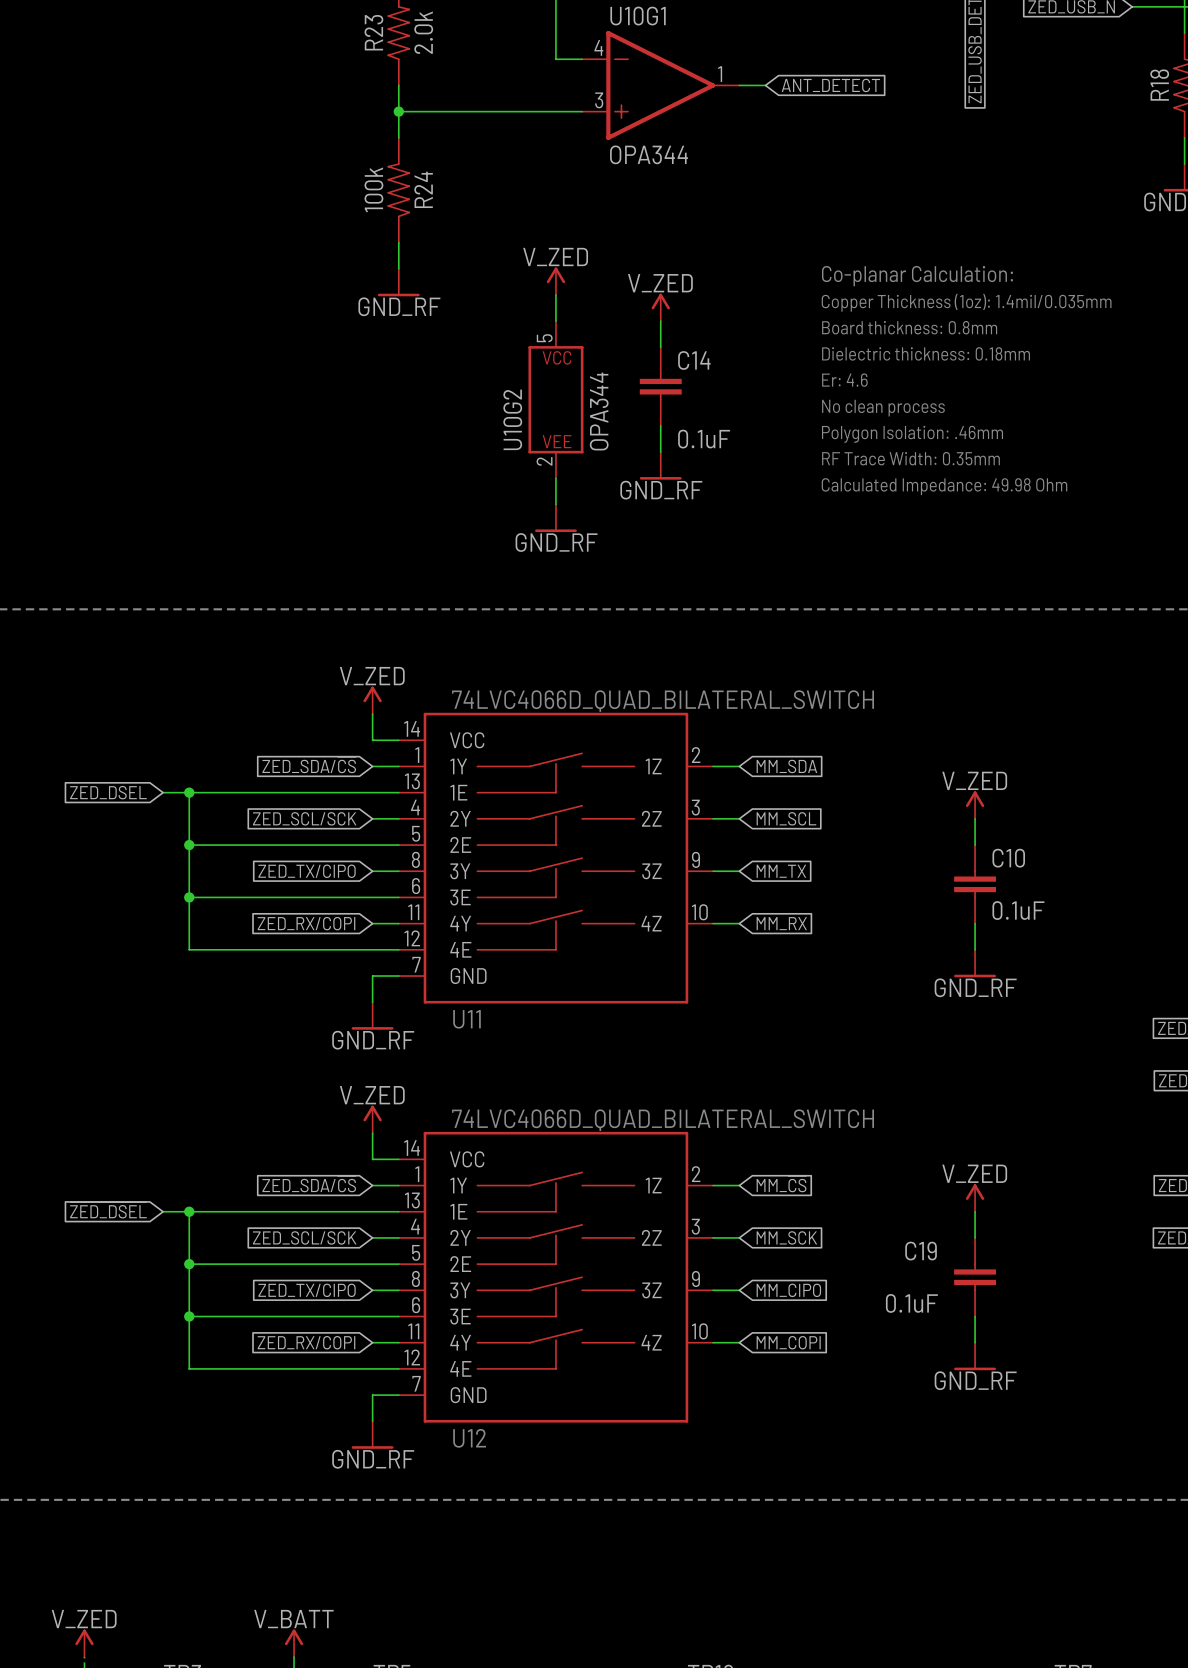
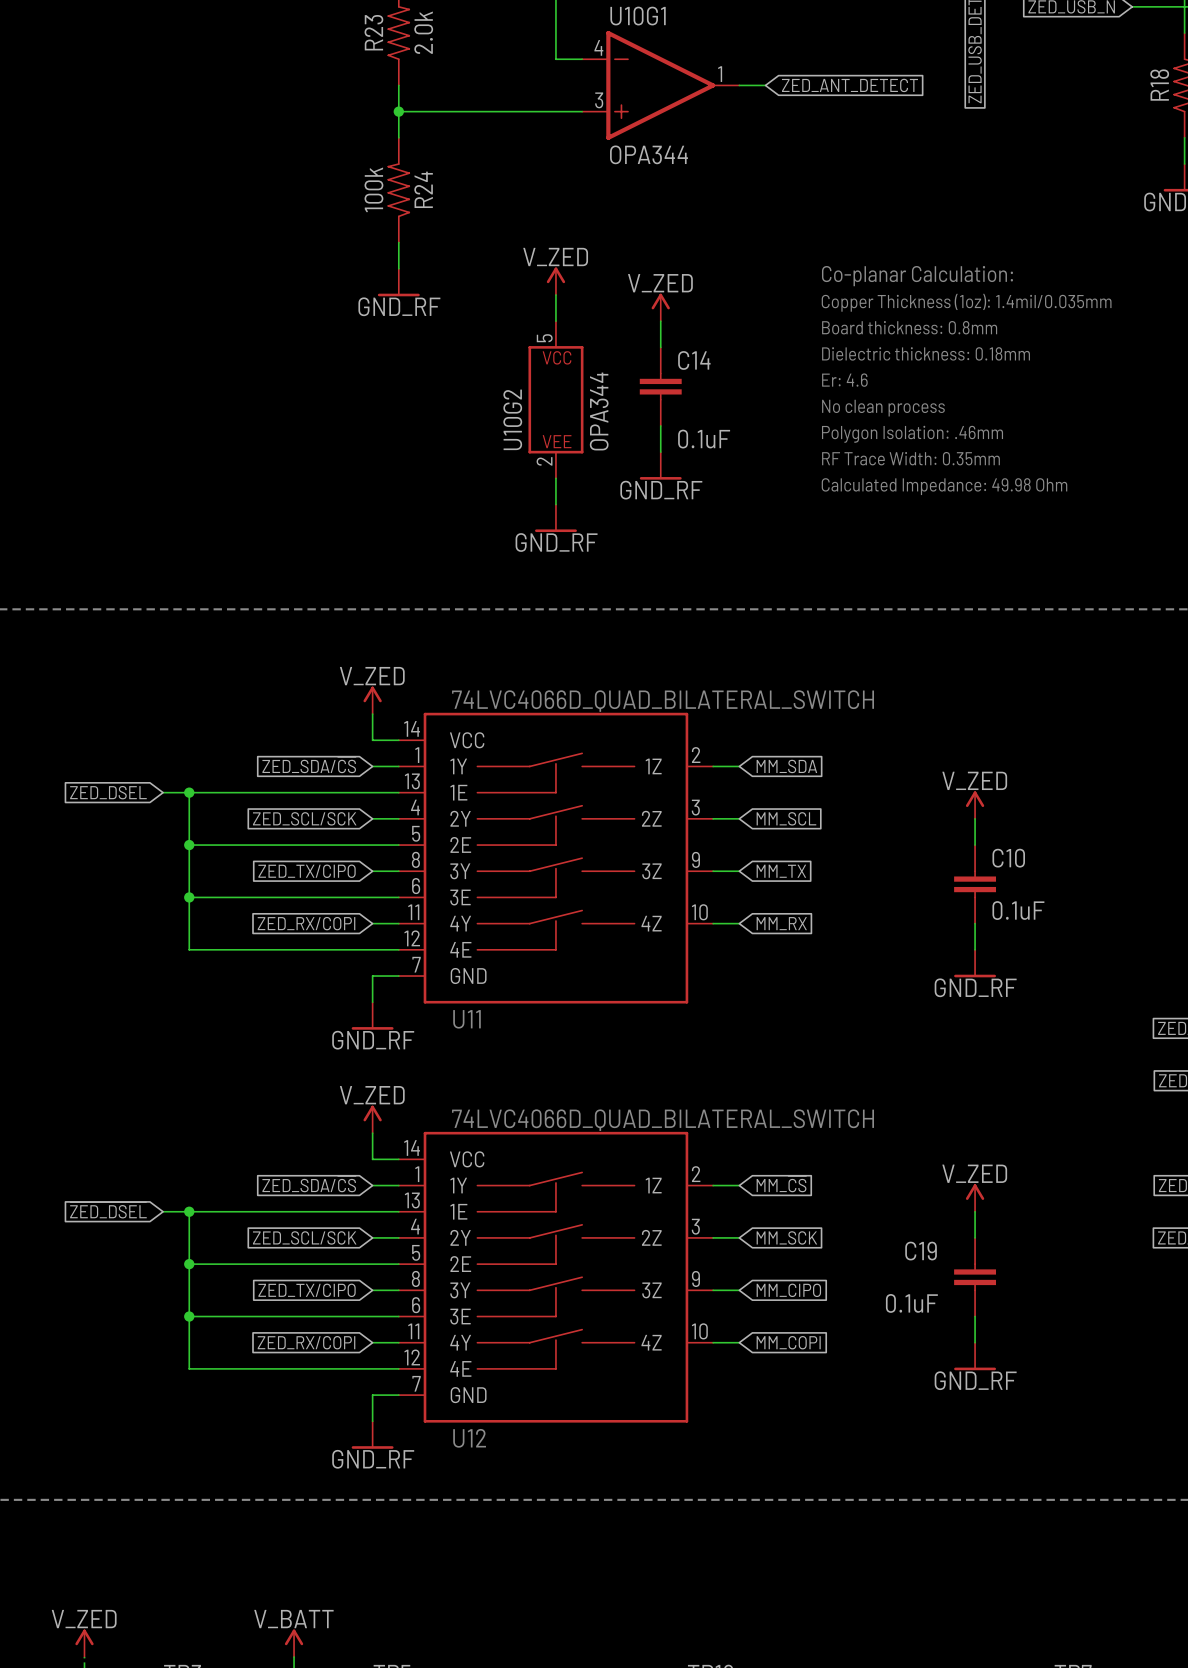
global label: ANT_DETECT (830, 85) -> ZED_ANT_DETECT (849, 85)

